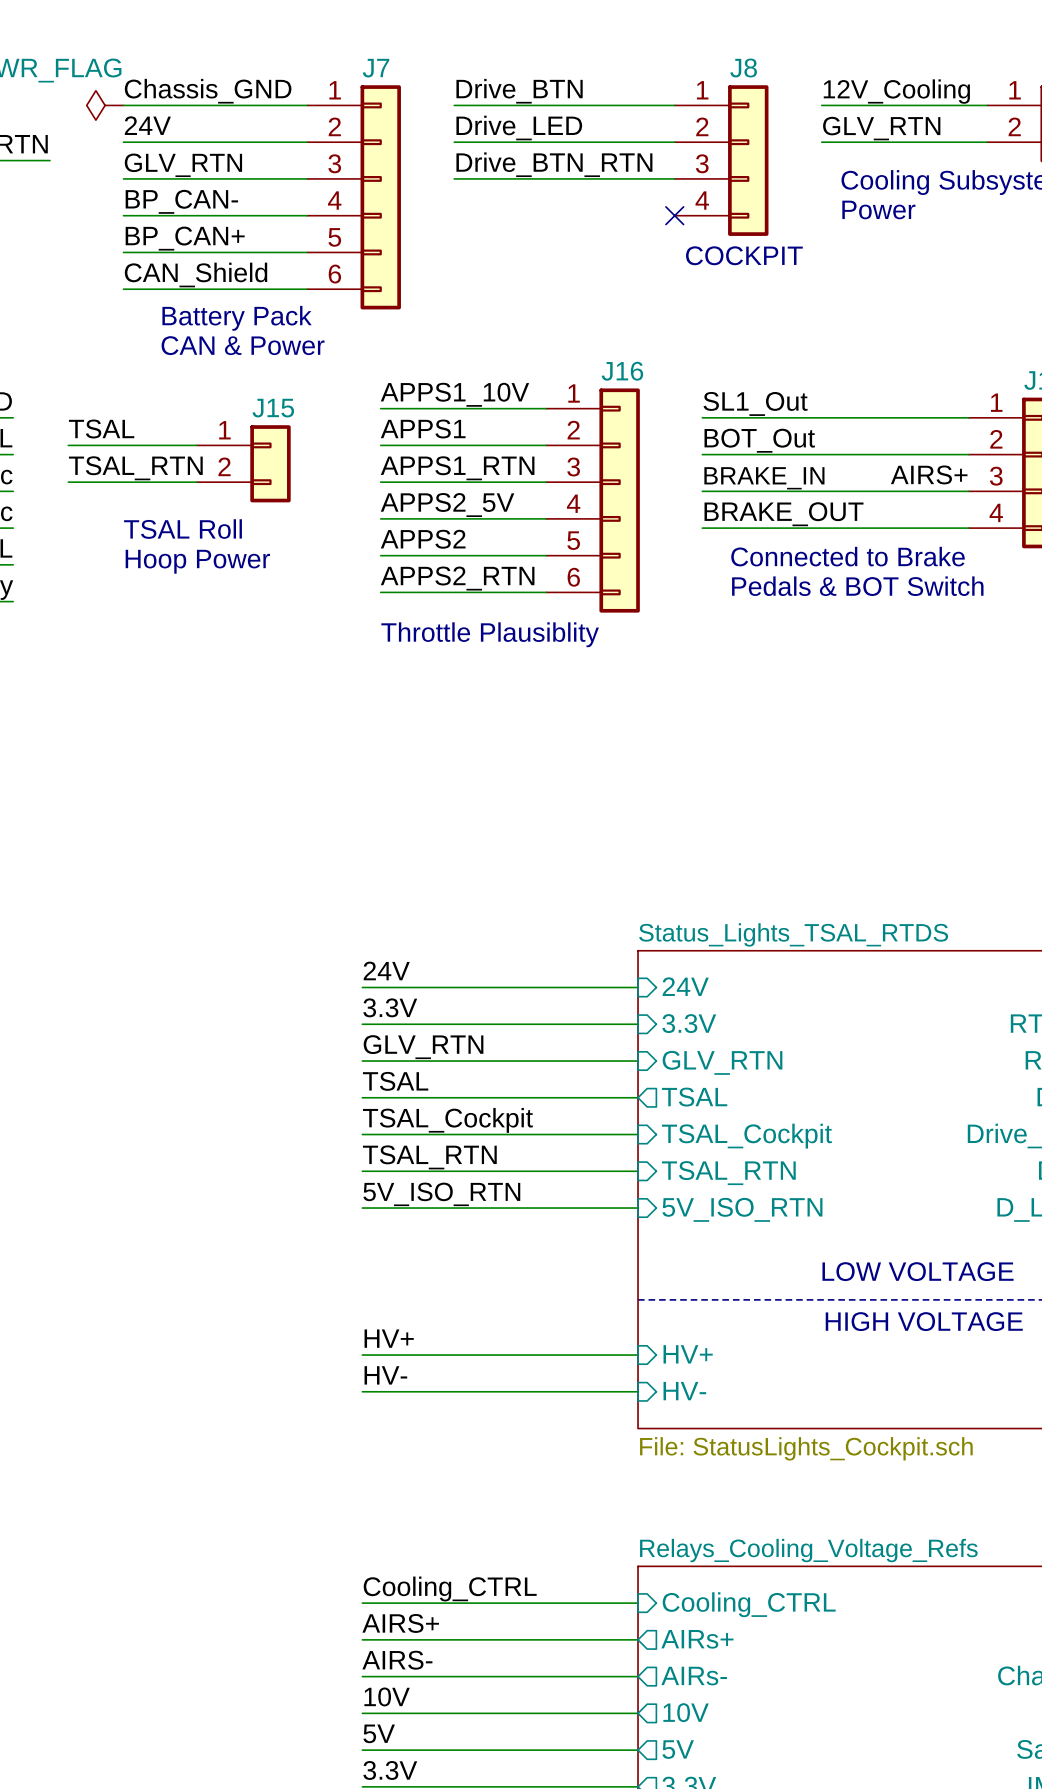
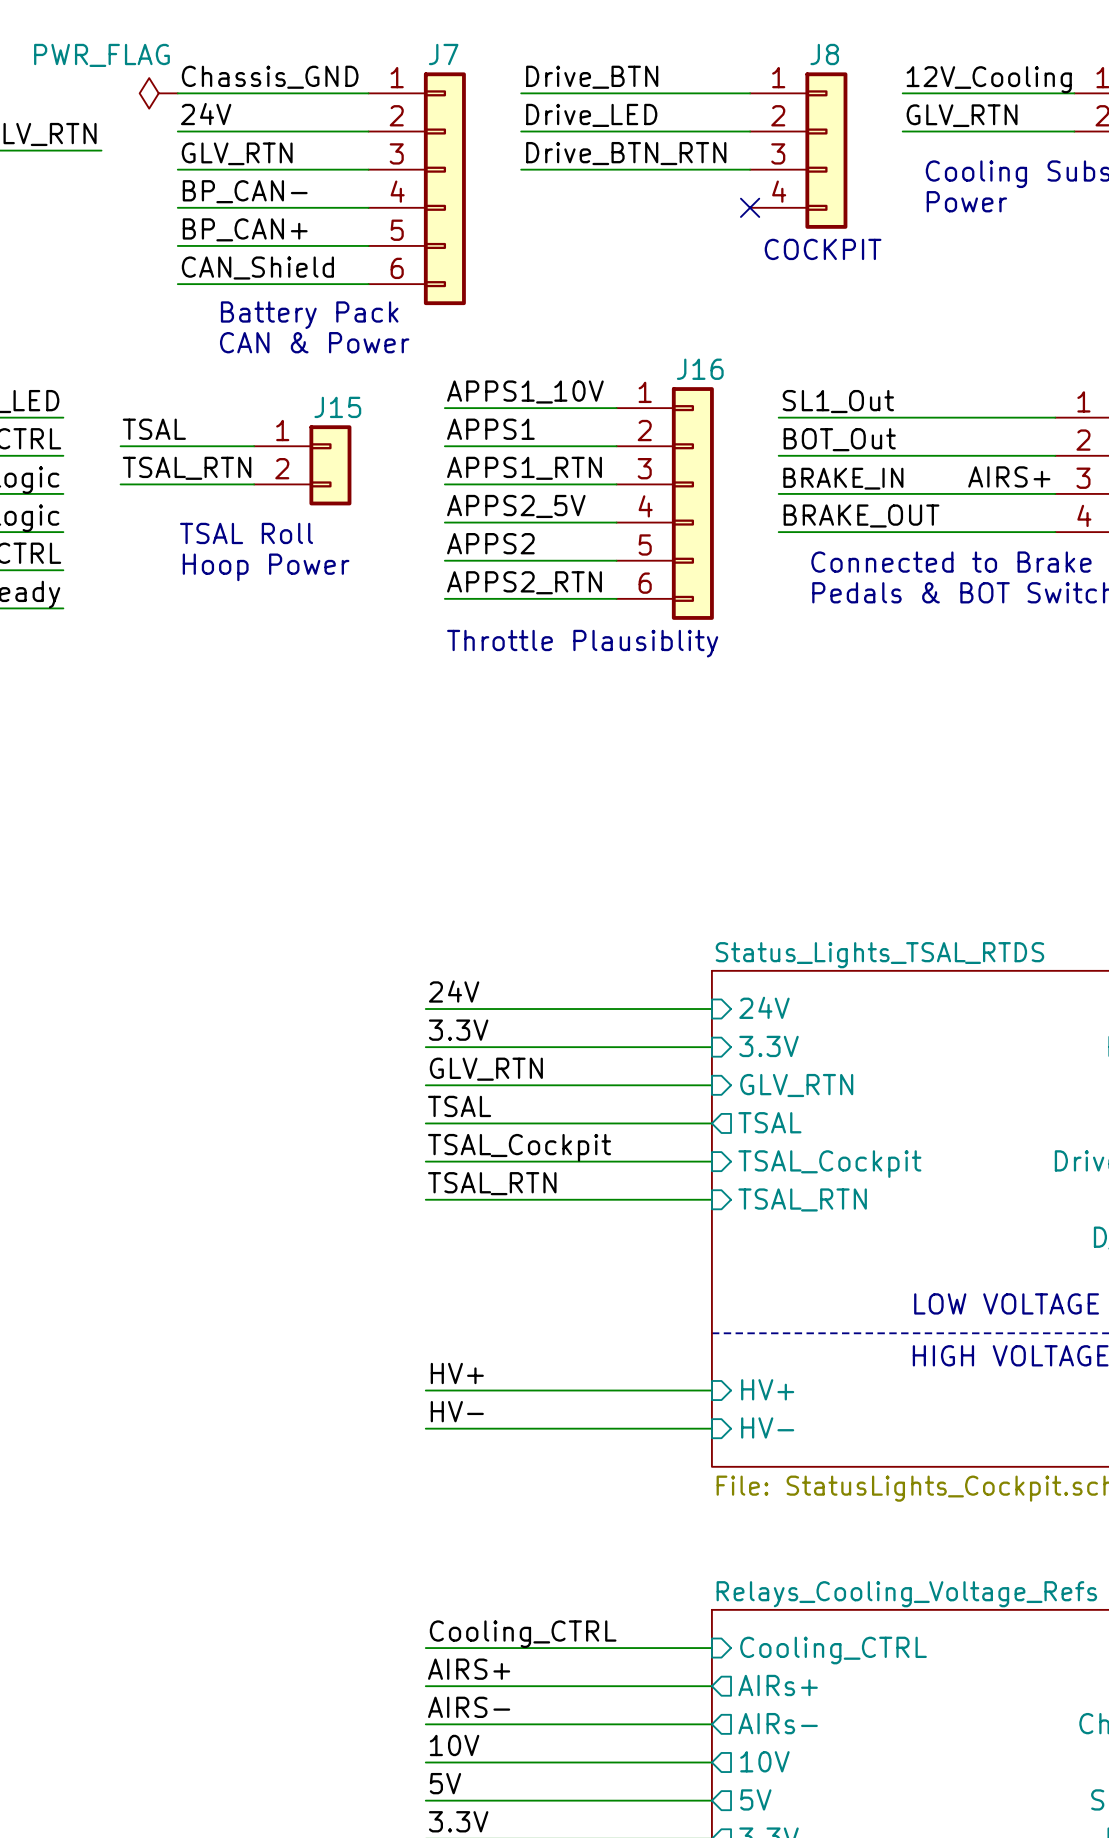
label: 5V_ISO_RTN (441, 1194) -> none
wire: (362, 1208) (638, 1208) -> none
sheet pin: 5V_ISO_RTN (742, 1209) -> none

